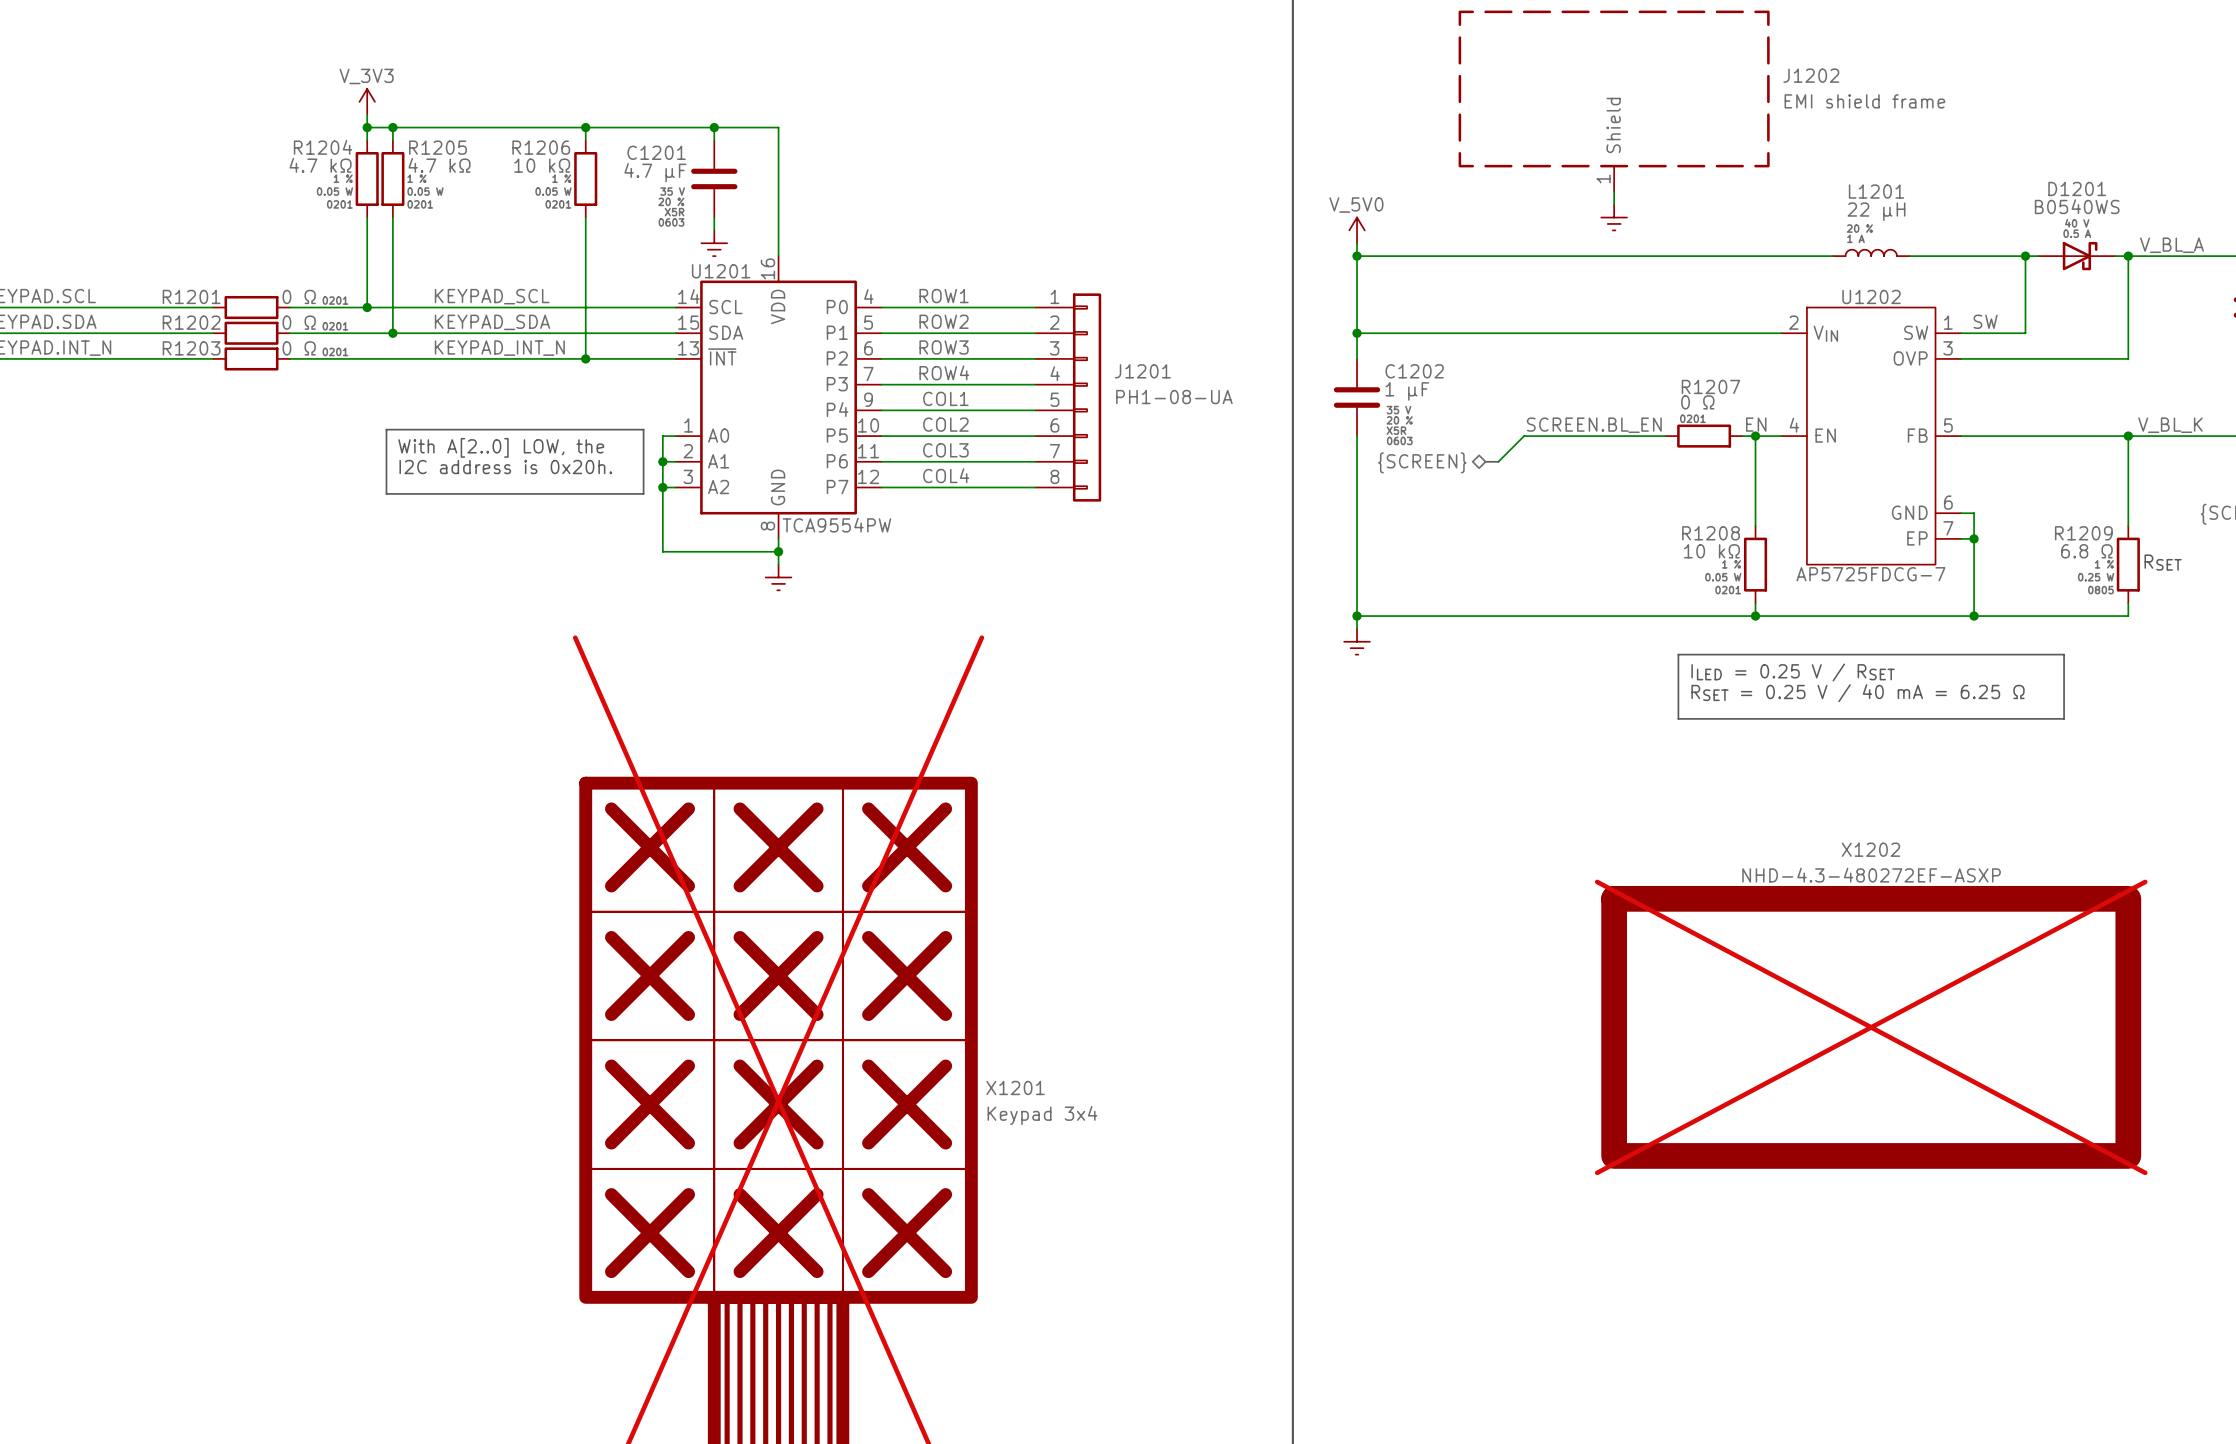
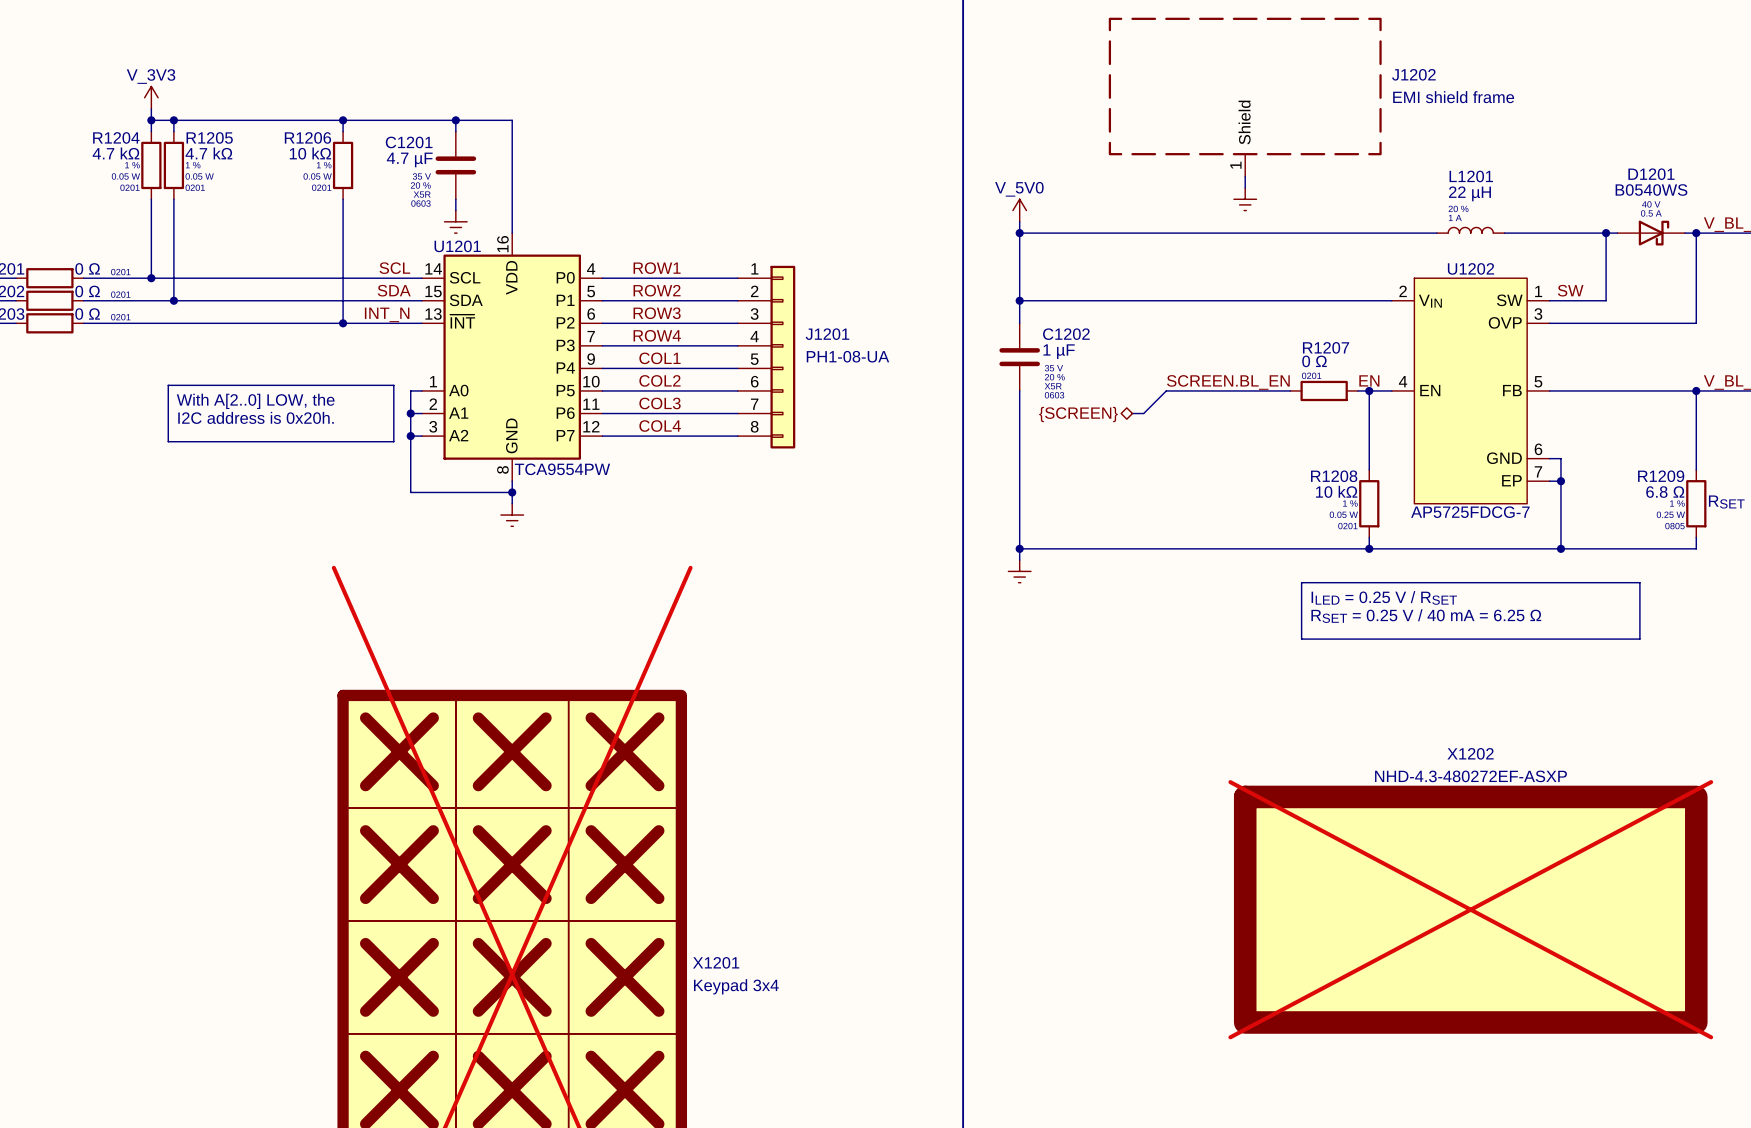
label: KEYPAD_SCL (492, 296) -> none
label: none -> SCL (394, 268)
label: none -> SDA (394, 290)
label: KEYPAD_SDA (492, 322) -> none
label: KEYPAD_INT_N (499, 348) -> none
label: none -> INT_N (387, 314)

